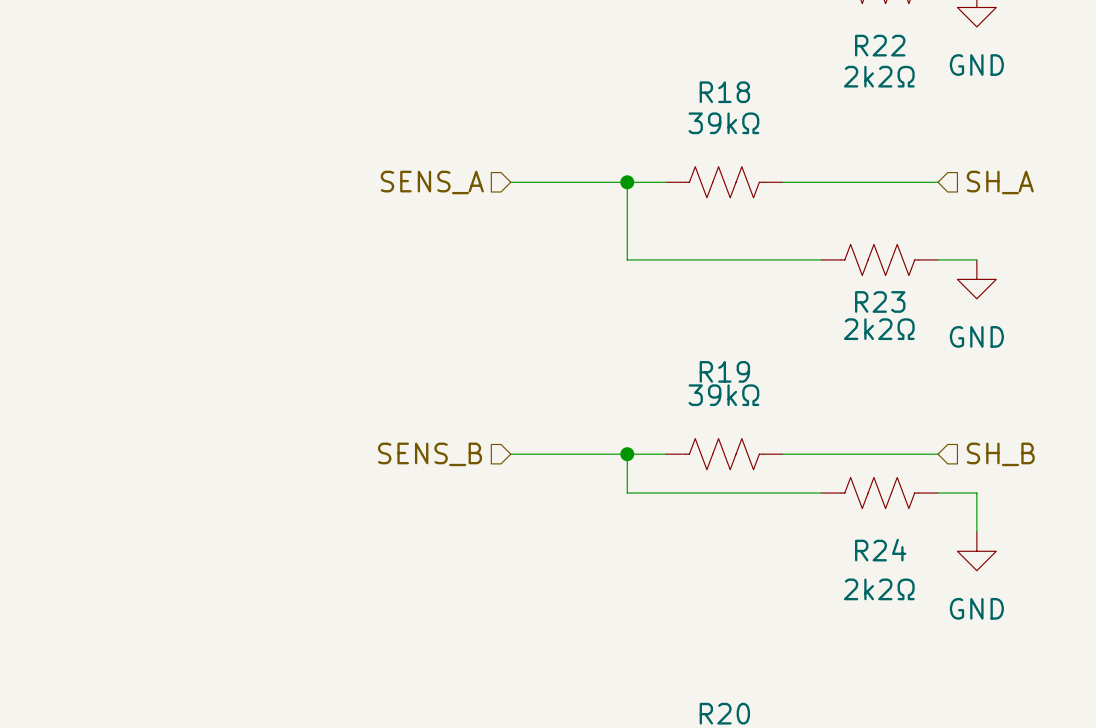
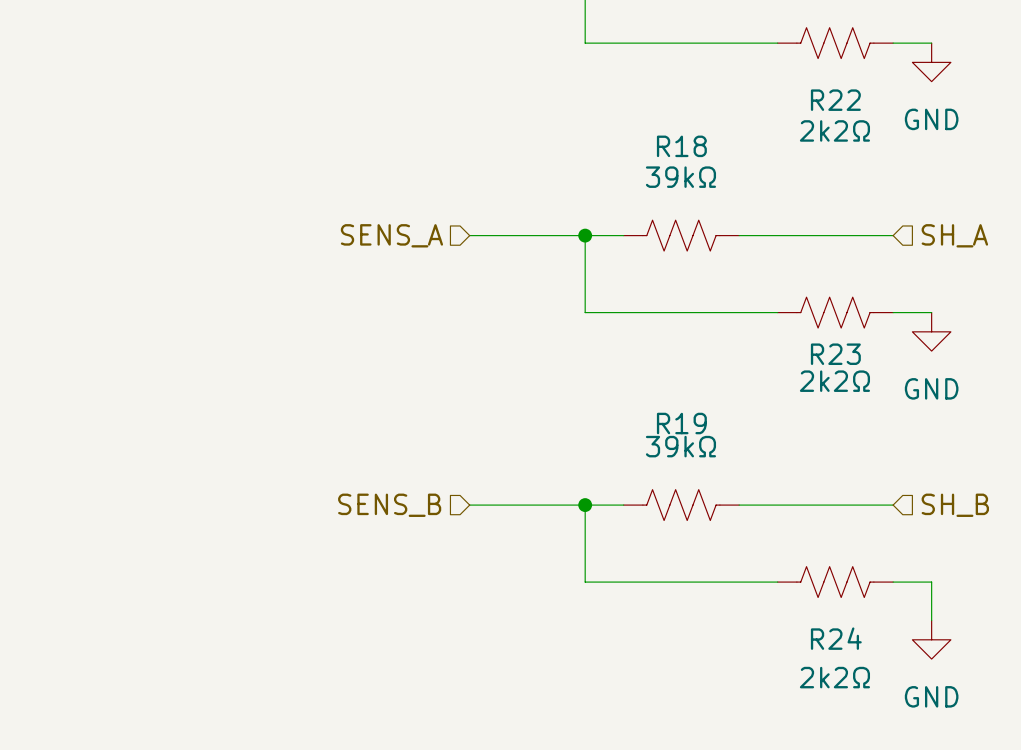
wire: (627, 493) (821, 493) -> (585, 543) (585, 582) (777, 582)
R24 position: (879, 493) -> (835, 582)
wire: (938, 493) (976, 493) (976, 531) -> (893, 582) (931, 582) (931, 620)
power symbol position: GND (976, 551) -> GND (931, 639)

